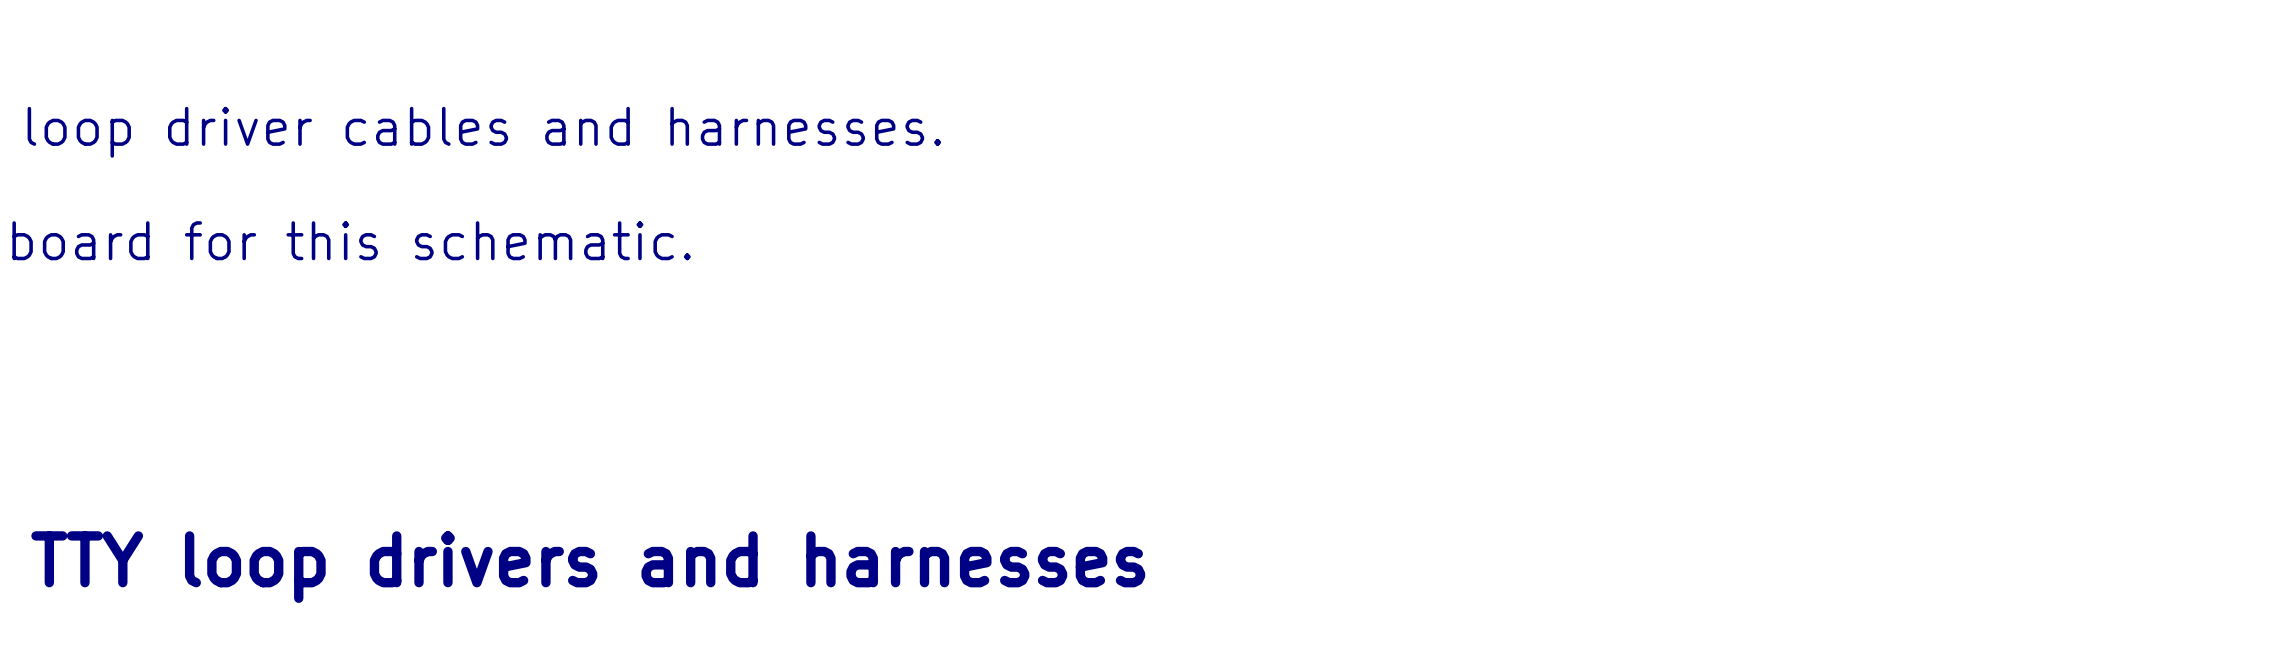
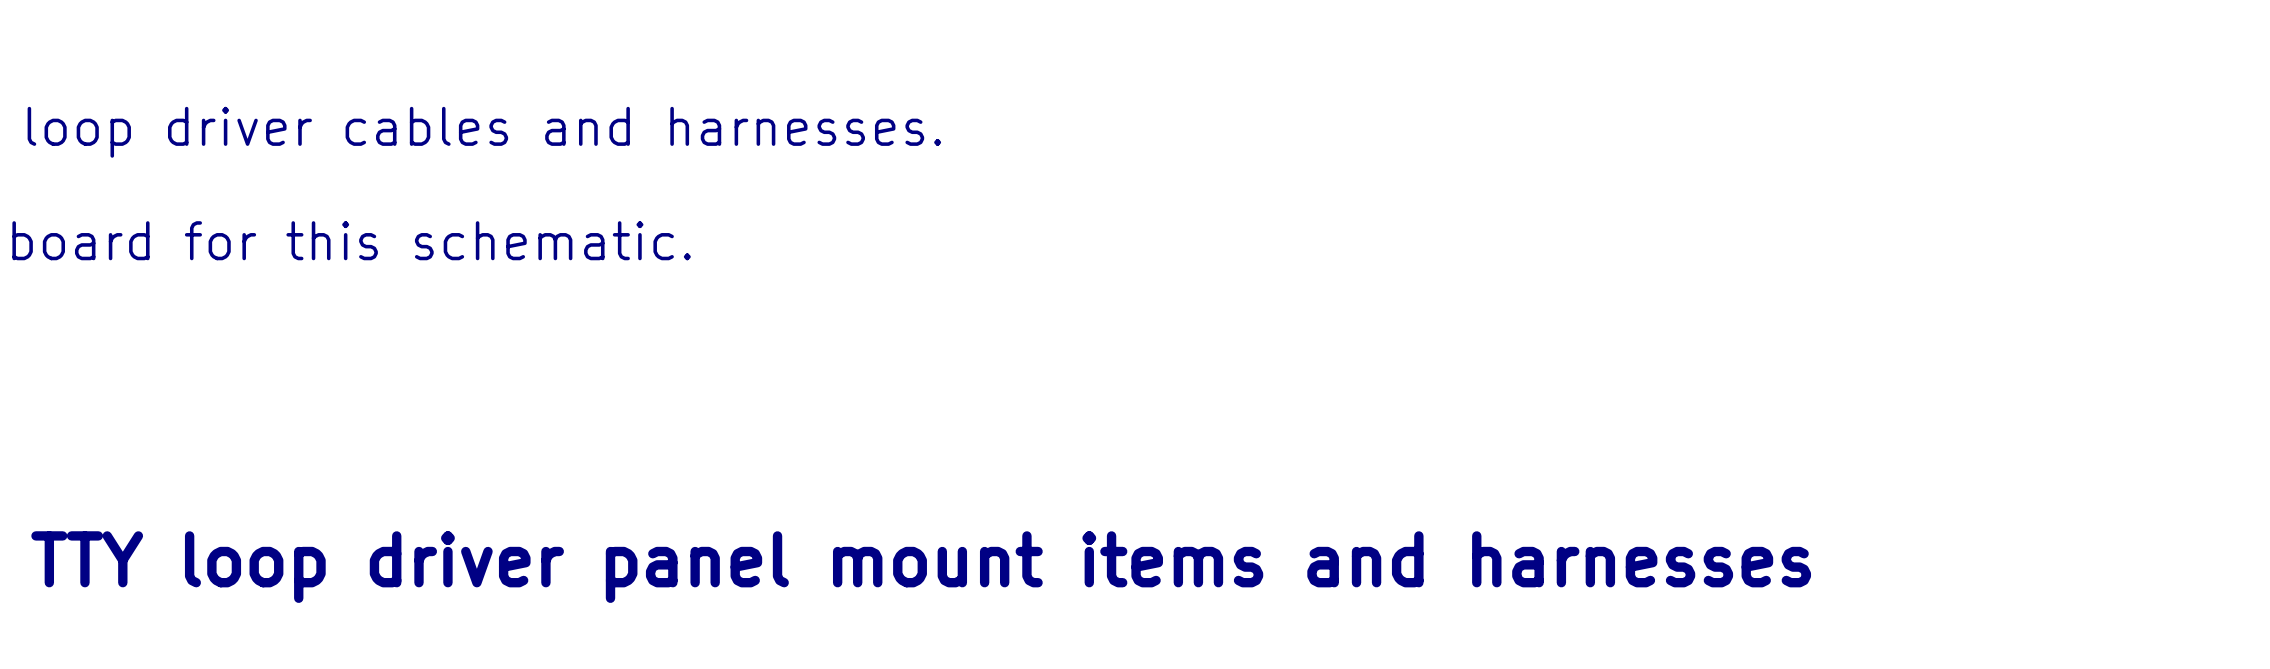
text: TTY loop drivers and harnesses (588, 567) -> TTY loop driver panel mount items and harnesses (921, 567)

